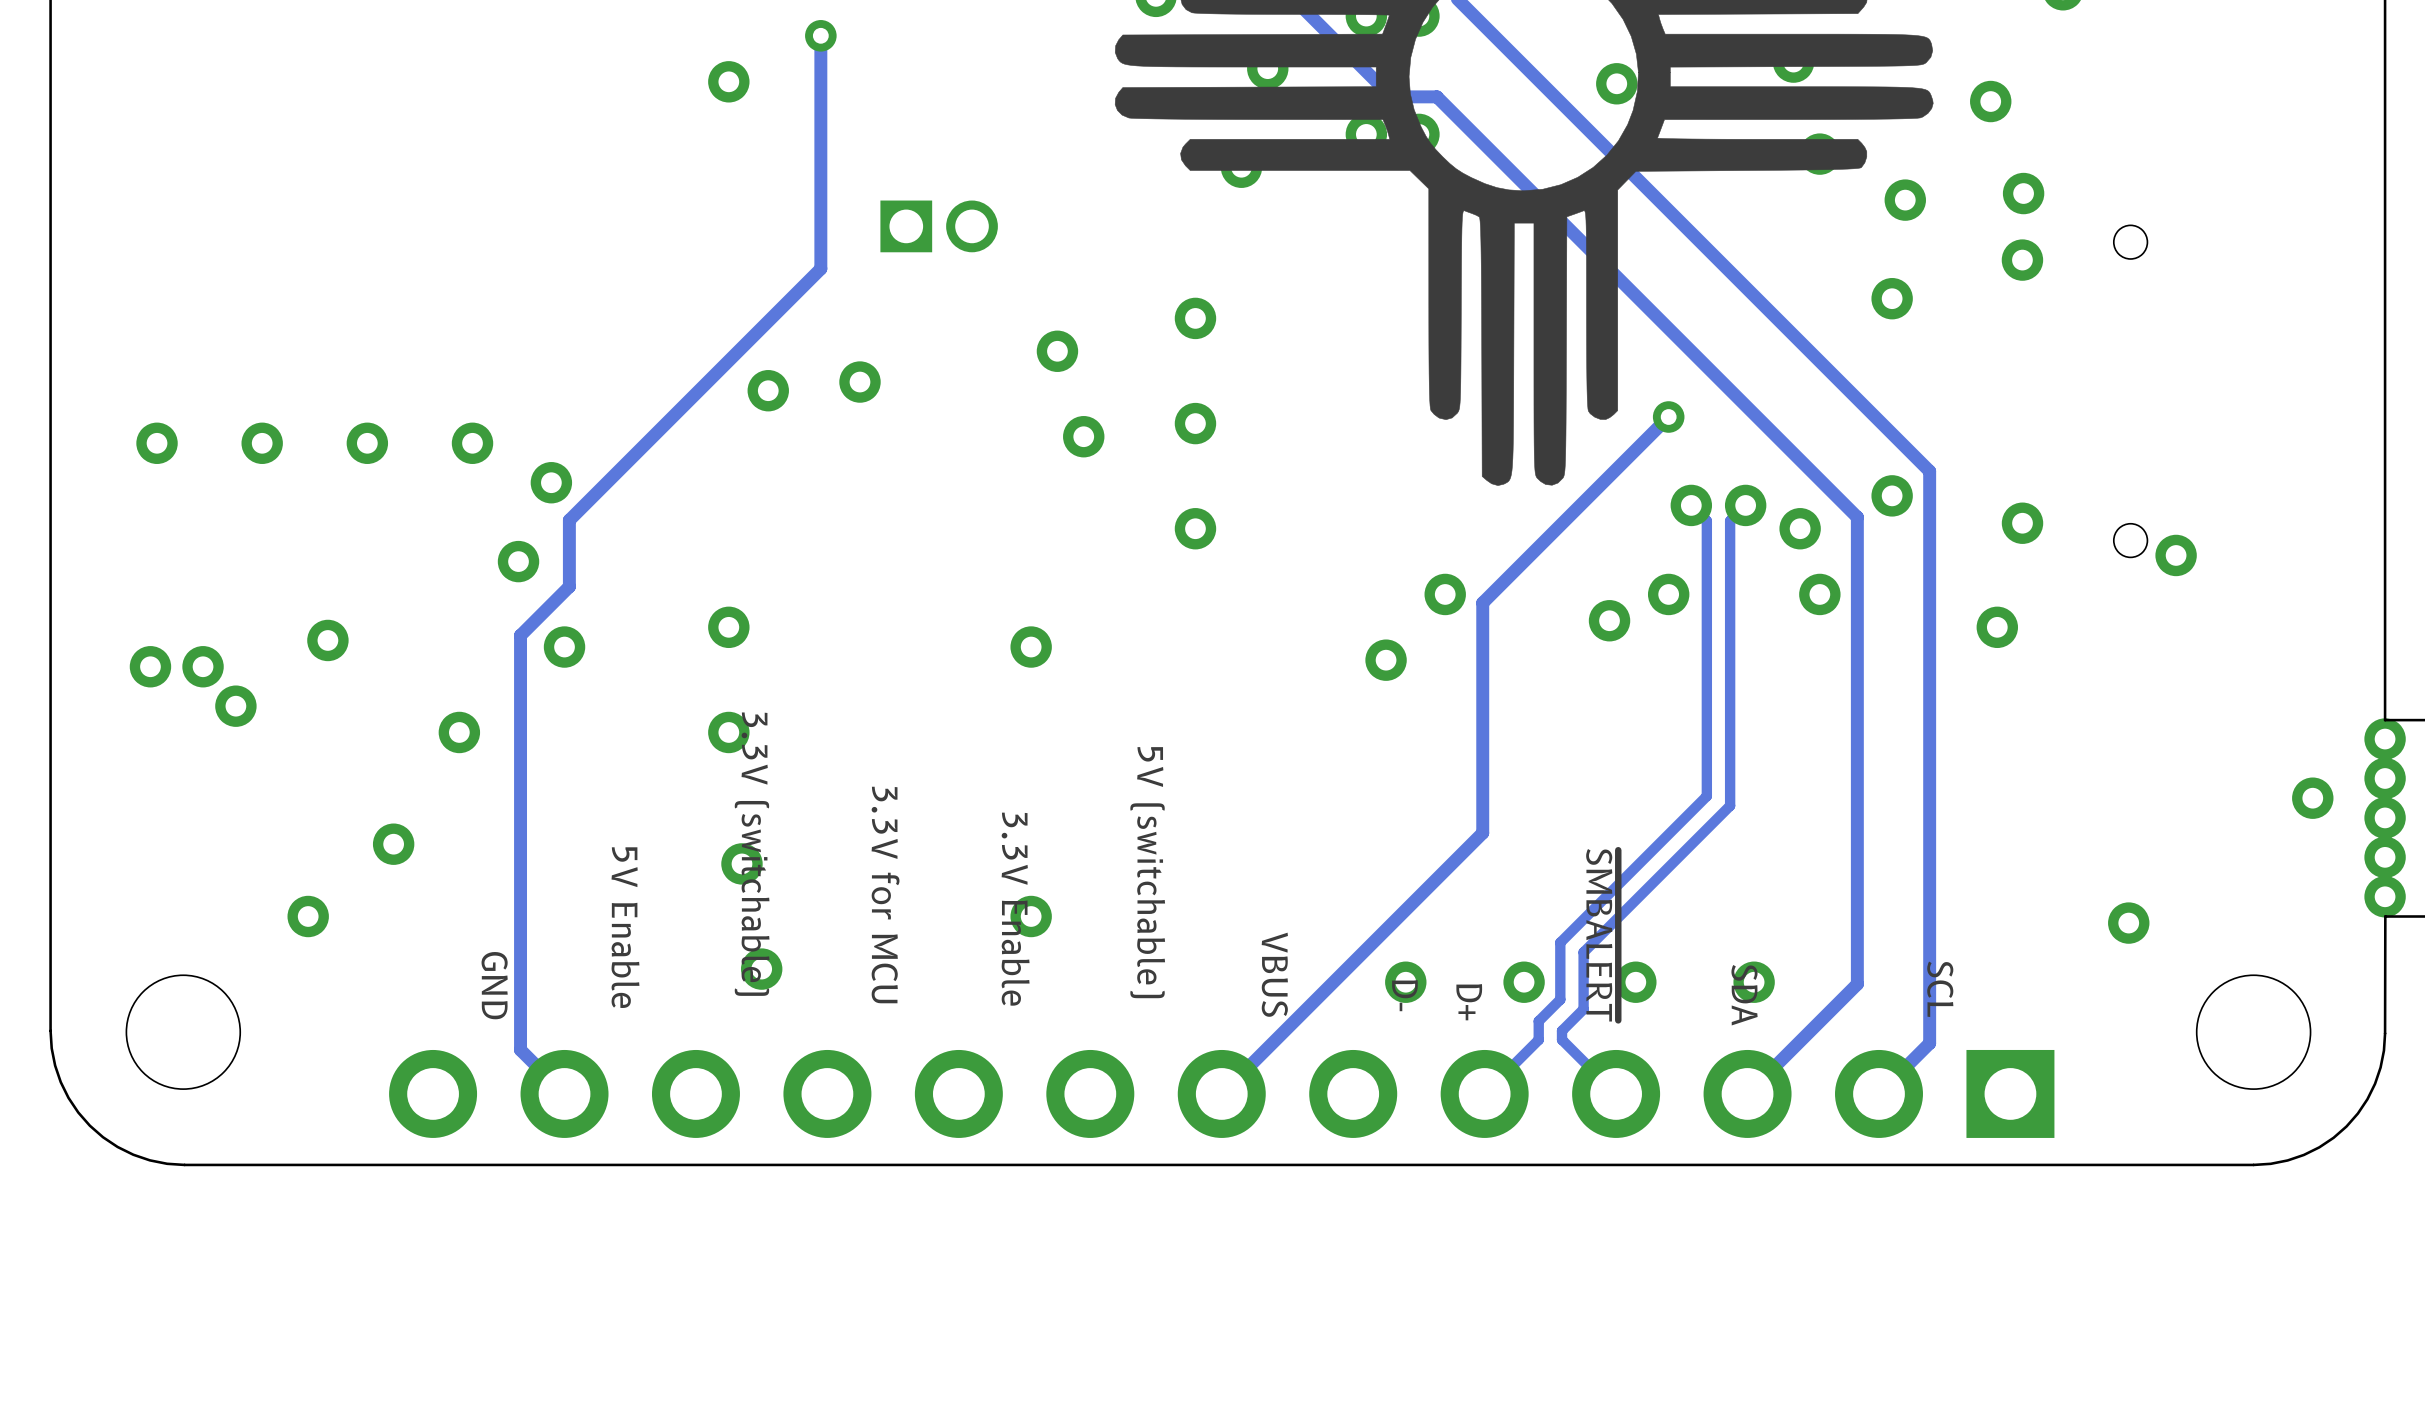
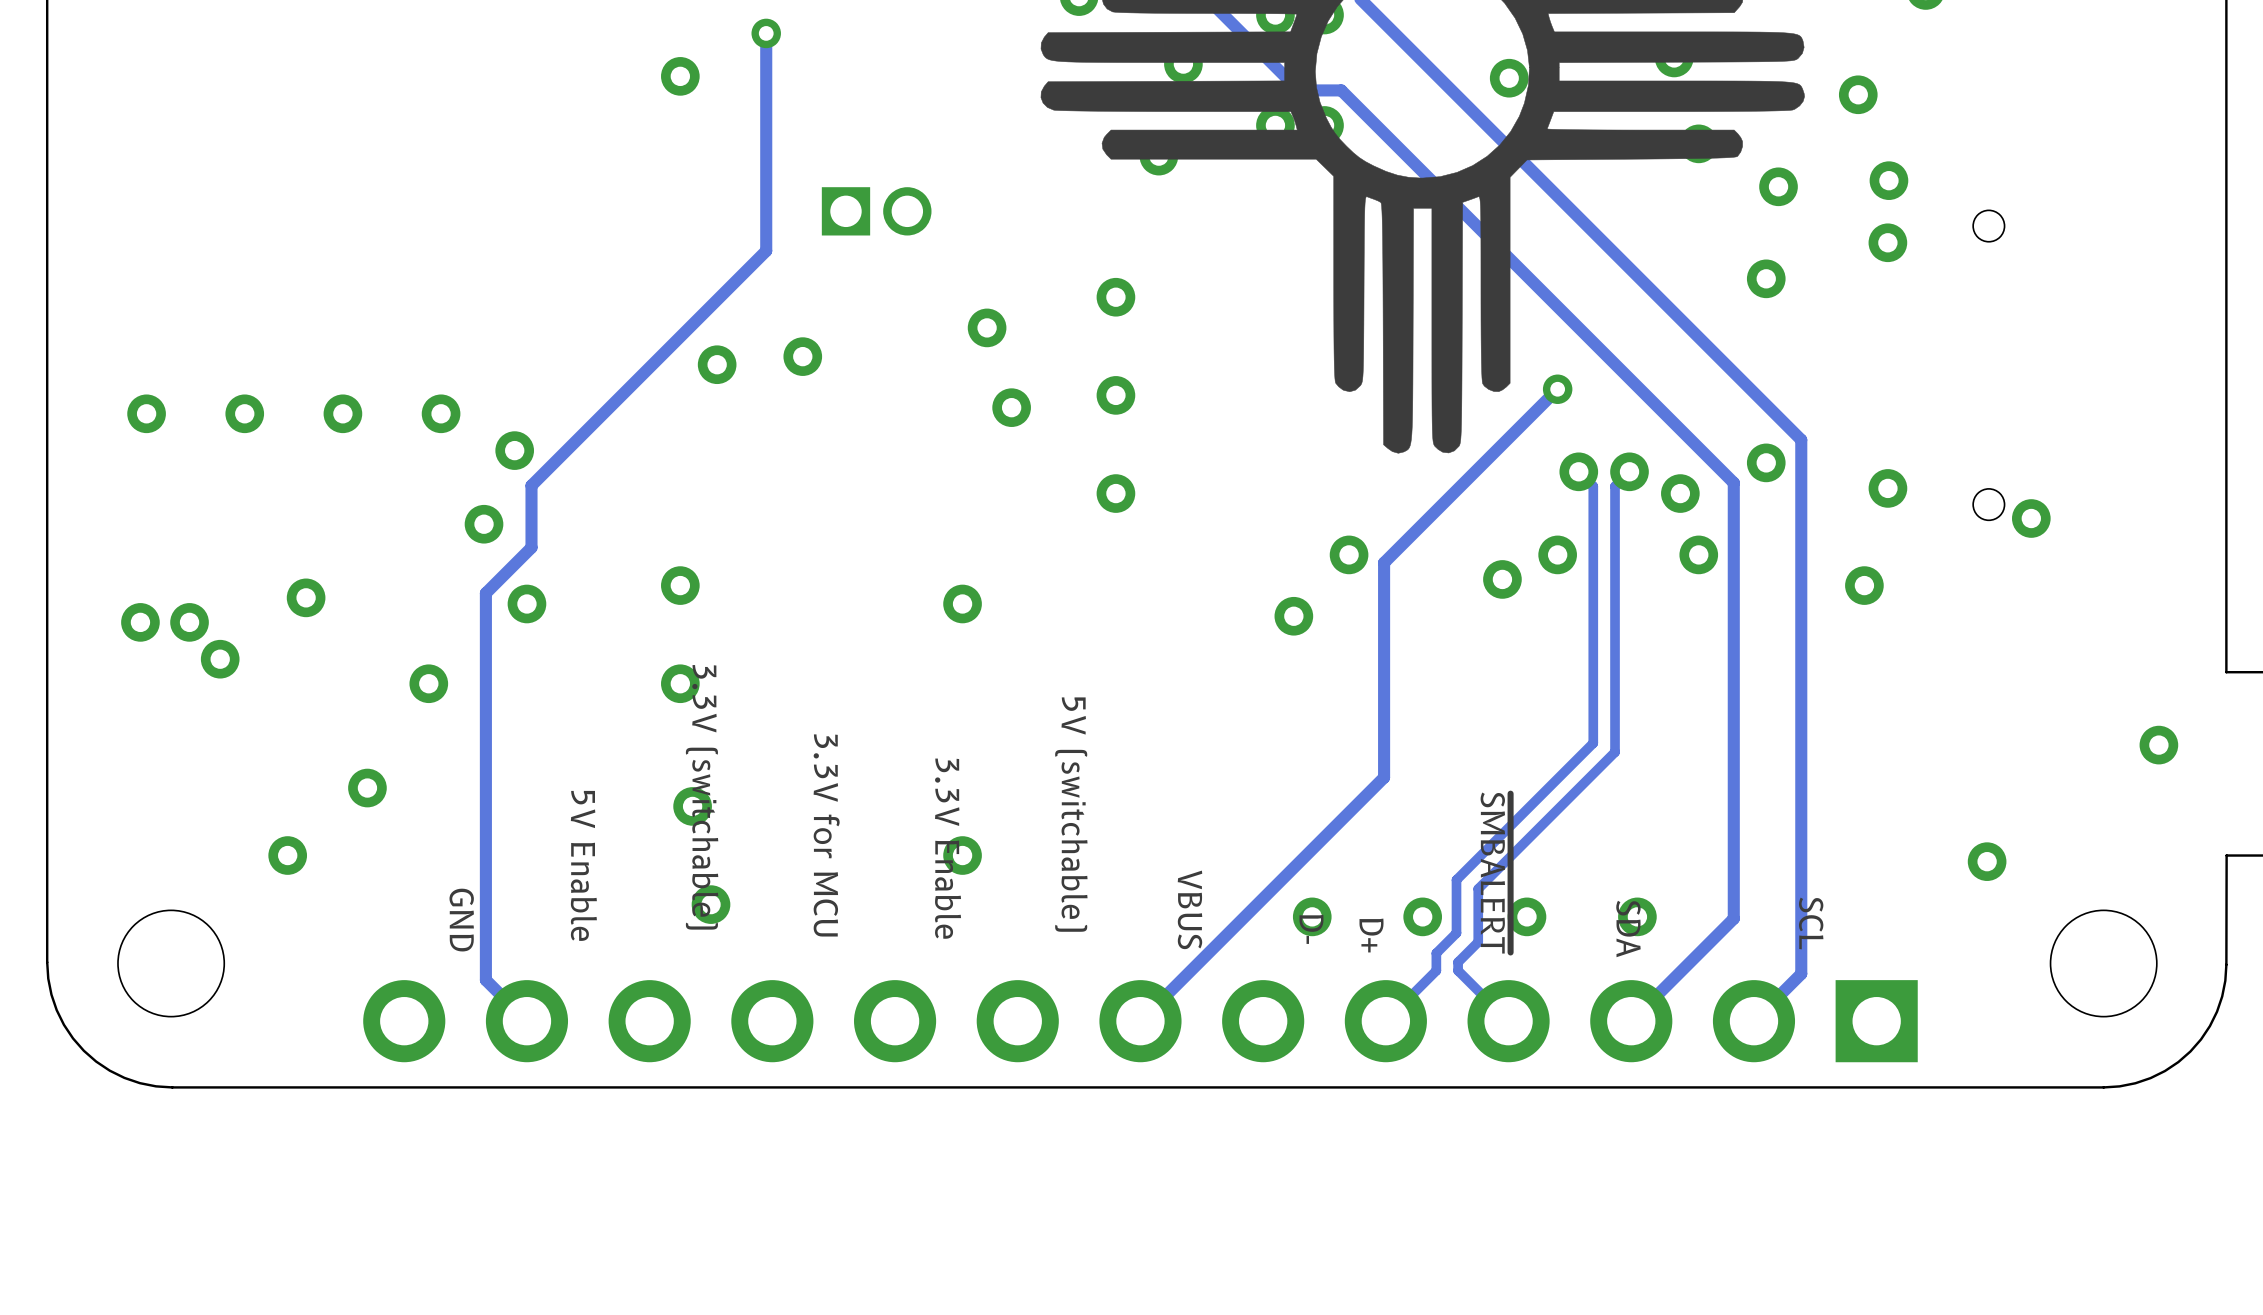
via: (2385, 739) -> none
via: (2385, 778) -> none
via: (2385, 817) -> none
via: (2385, 857) -> none
via: (2385, 896) -> none

